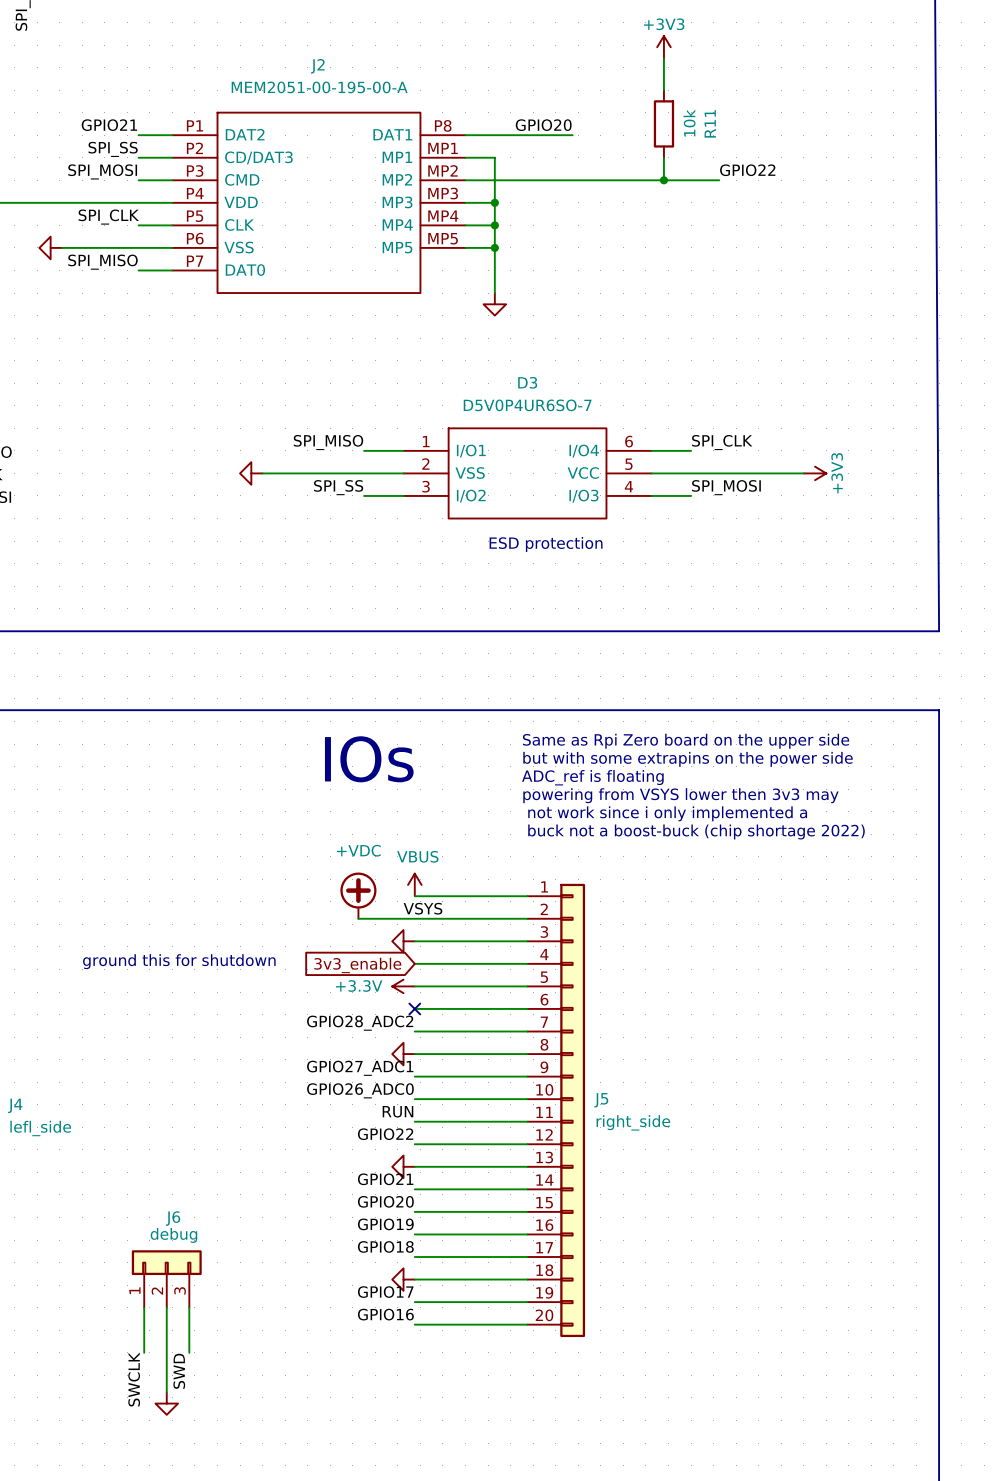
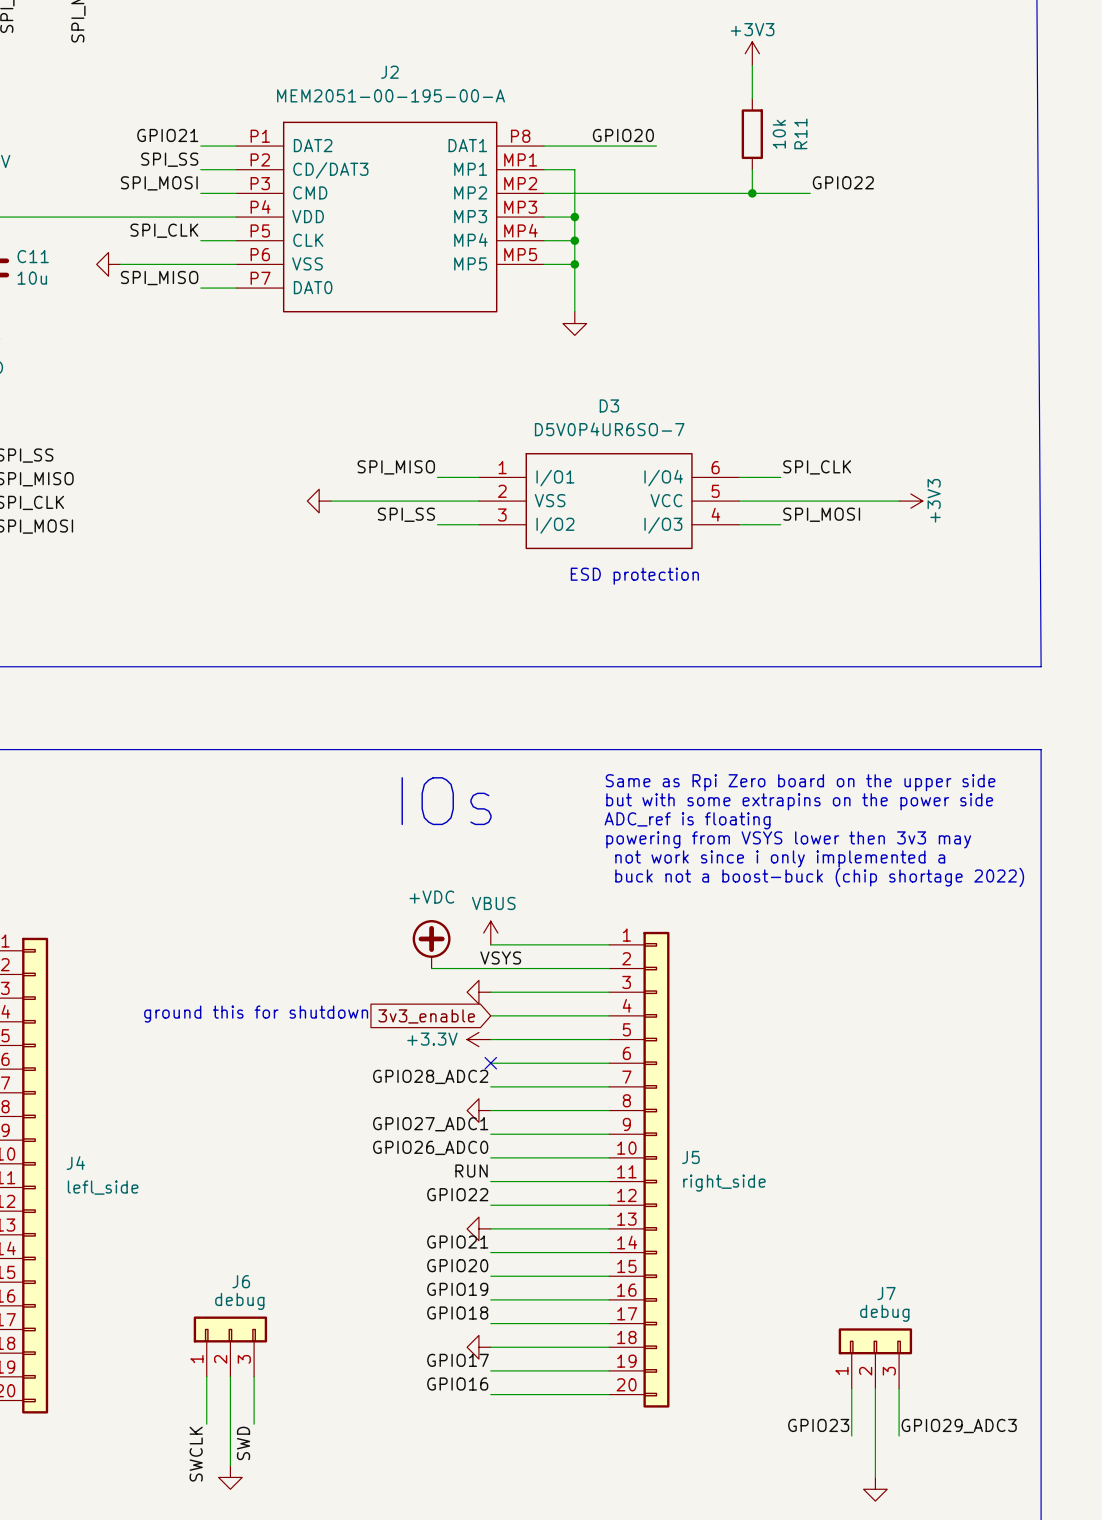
J7: none -> debug (875, 1358)
wire: none -> (851, 1388) (851, 1436)
wire: none -> (875, 1388) (875, 1477)
wire: none -> (899, 1388) (899, 1436)
label: none -> GPIO23 (818, 1425)
label: none -> GPIO29_ADC3 (959, 1426)
power symbol: none -> (875, 1489)

